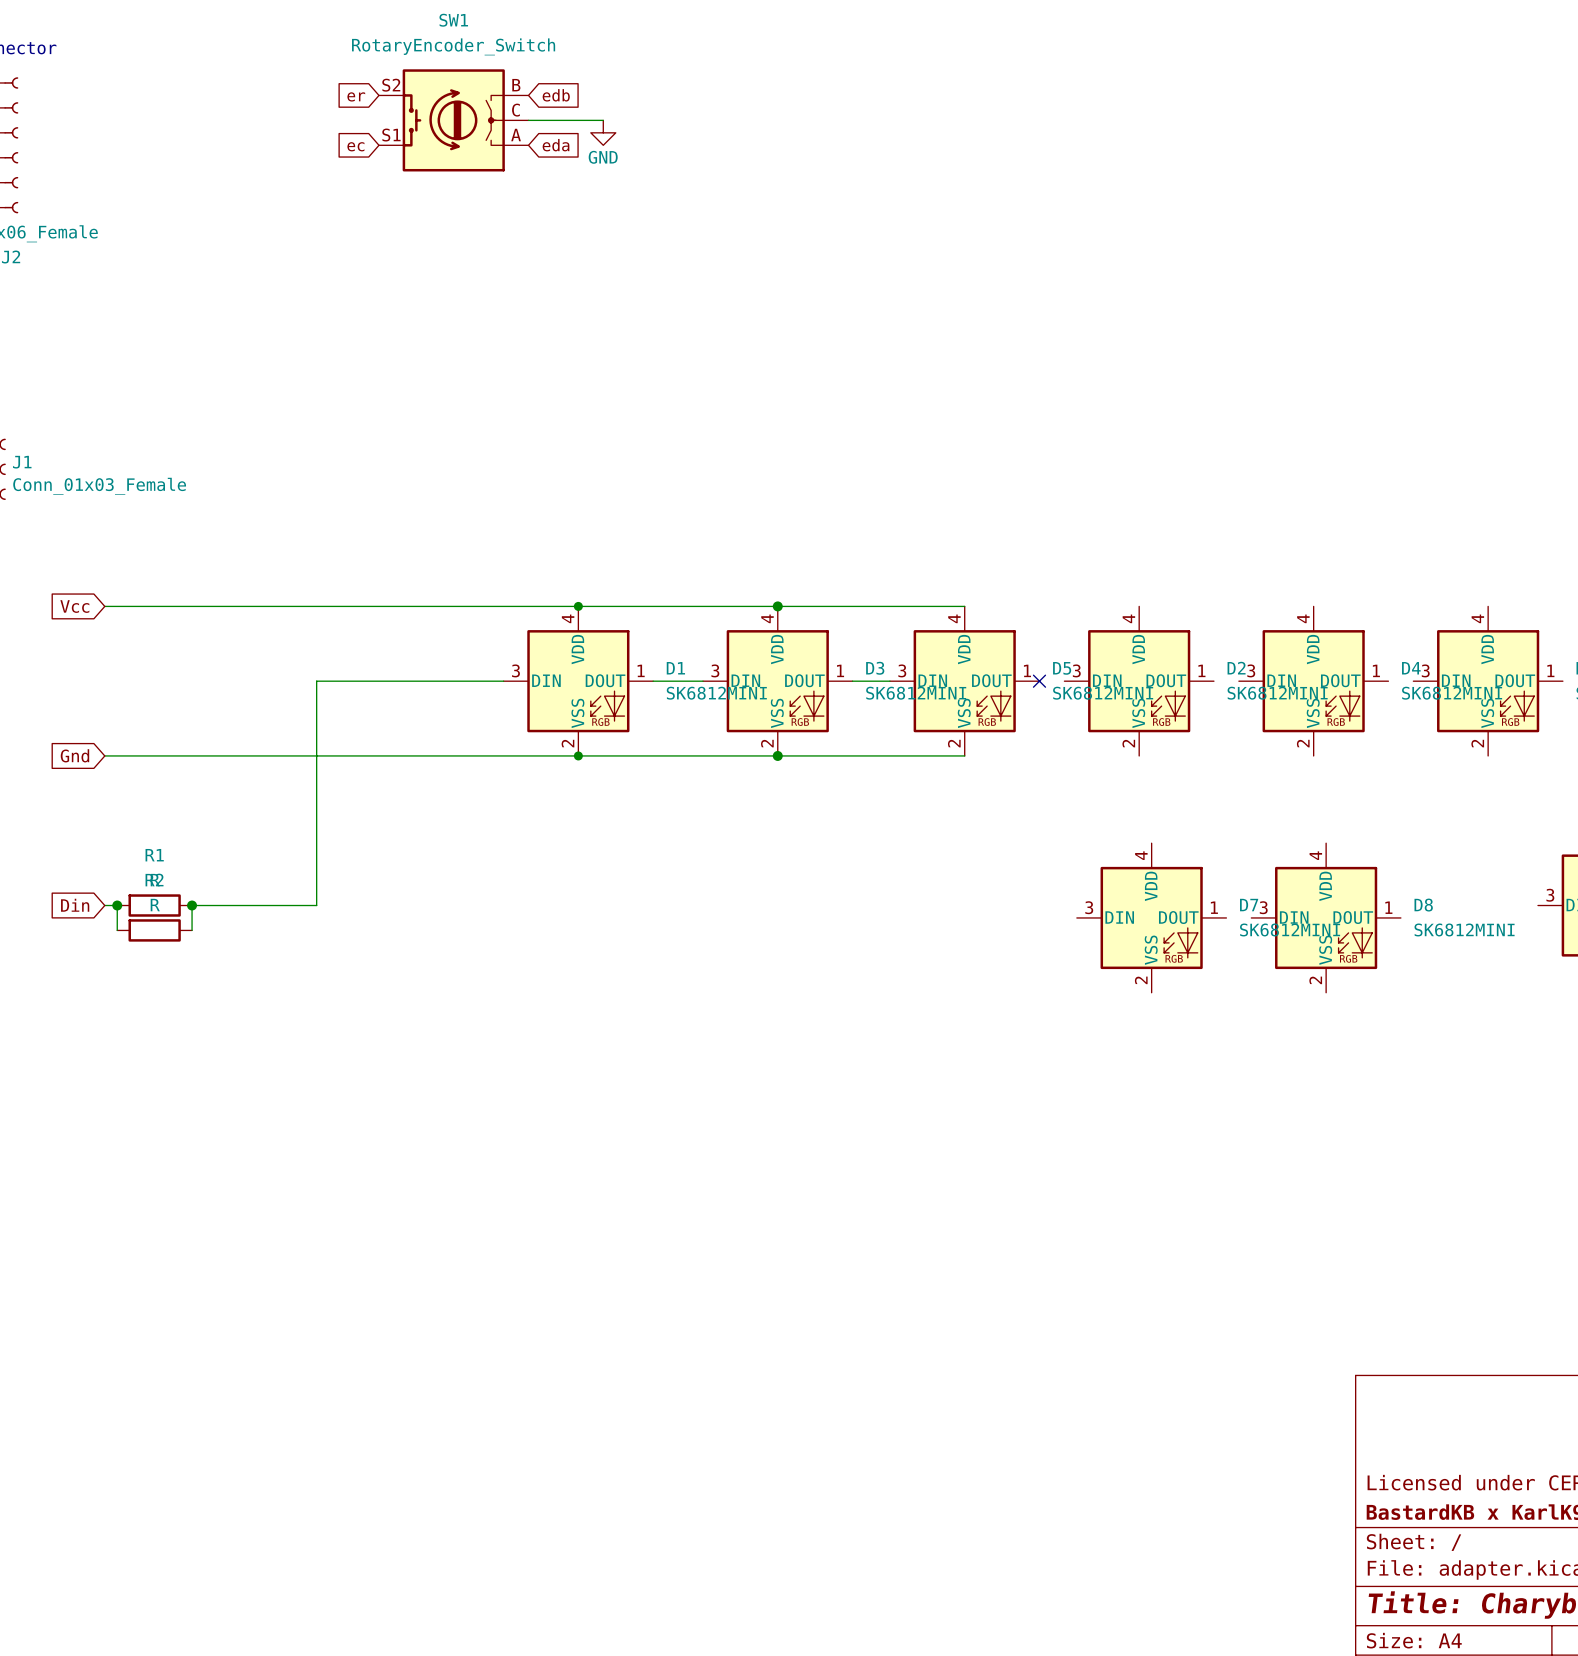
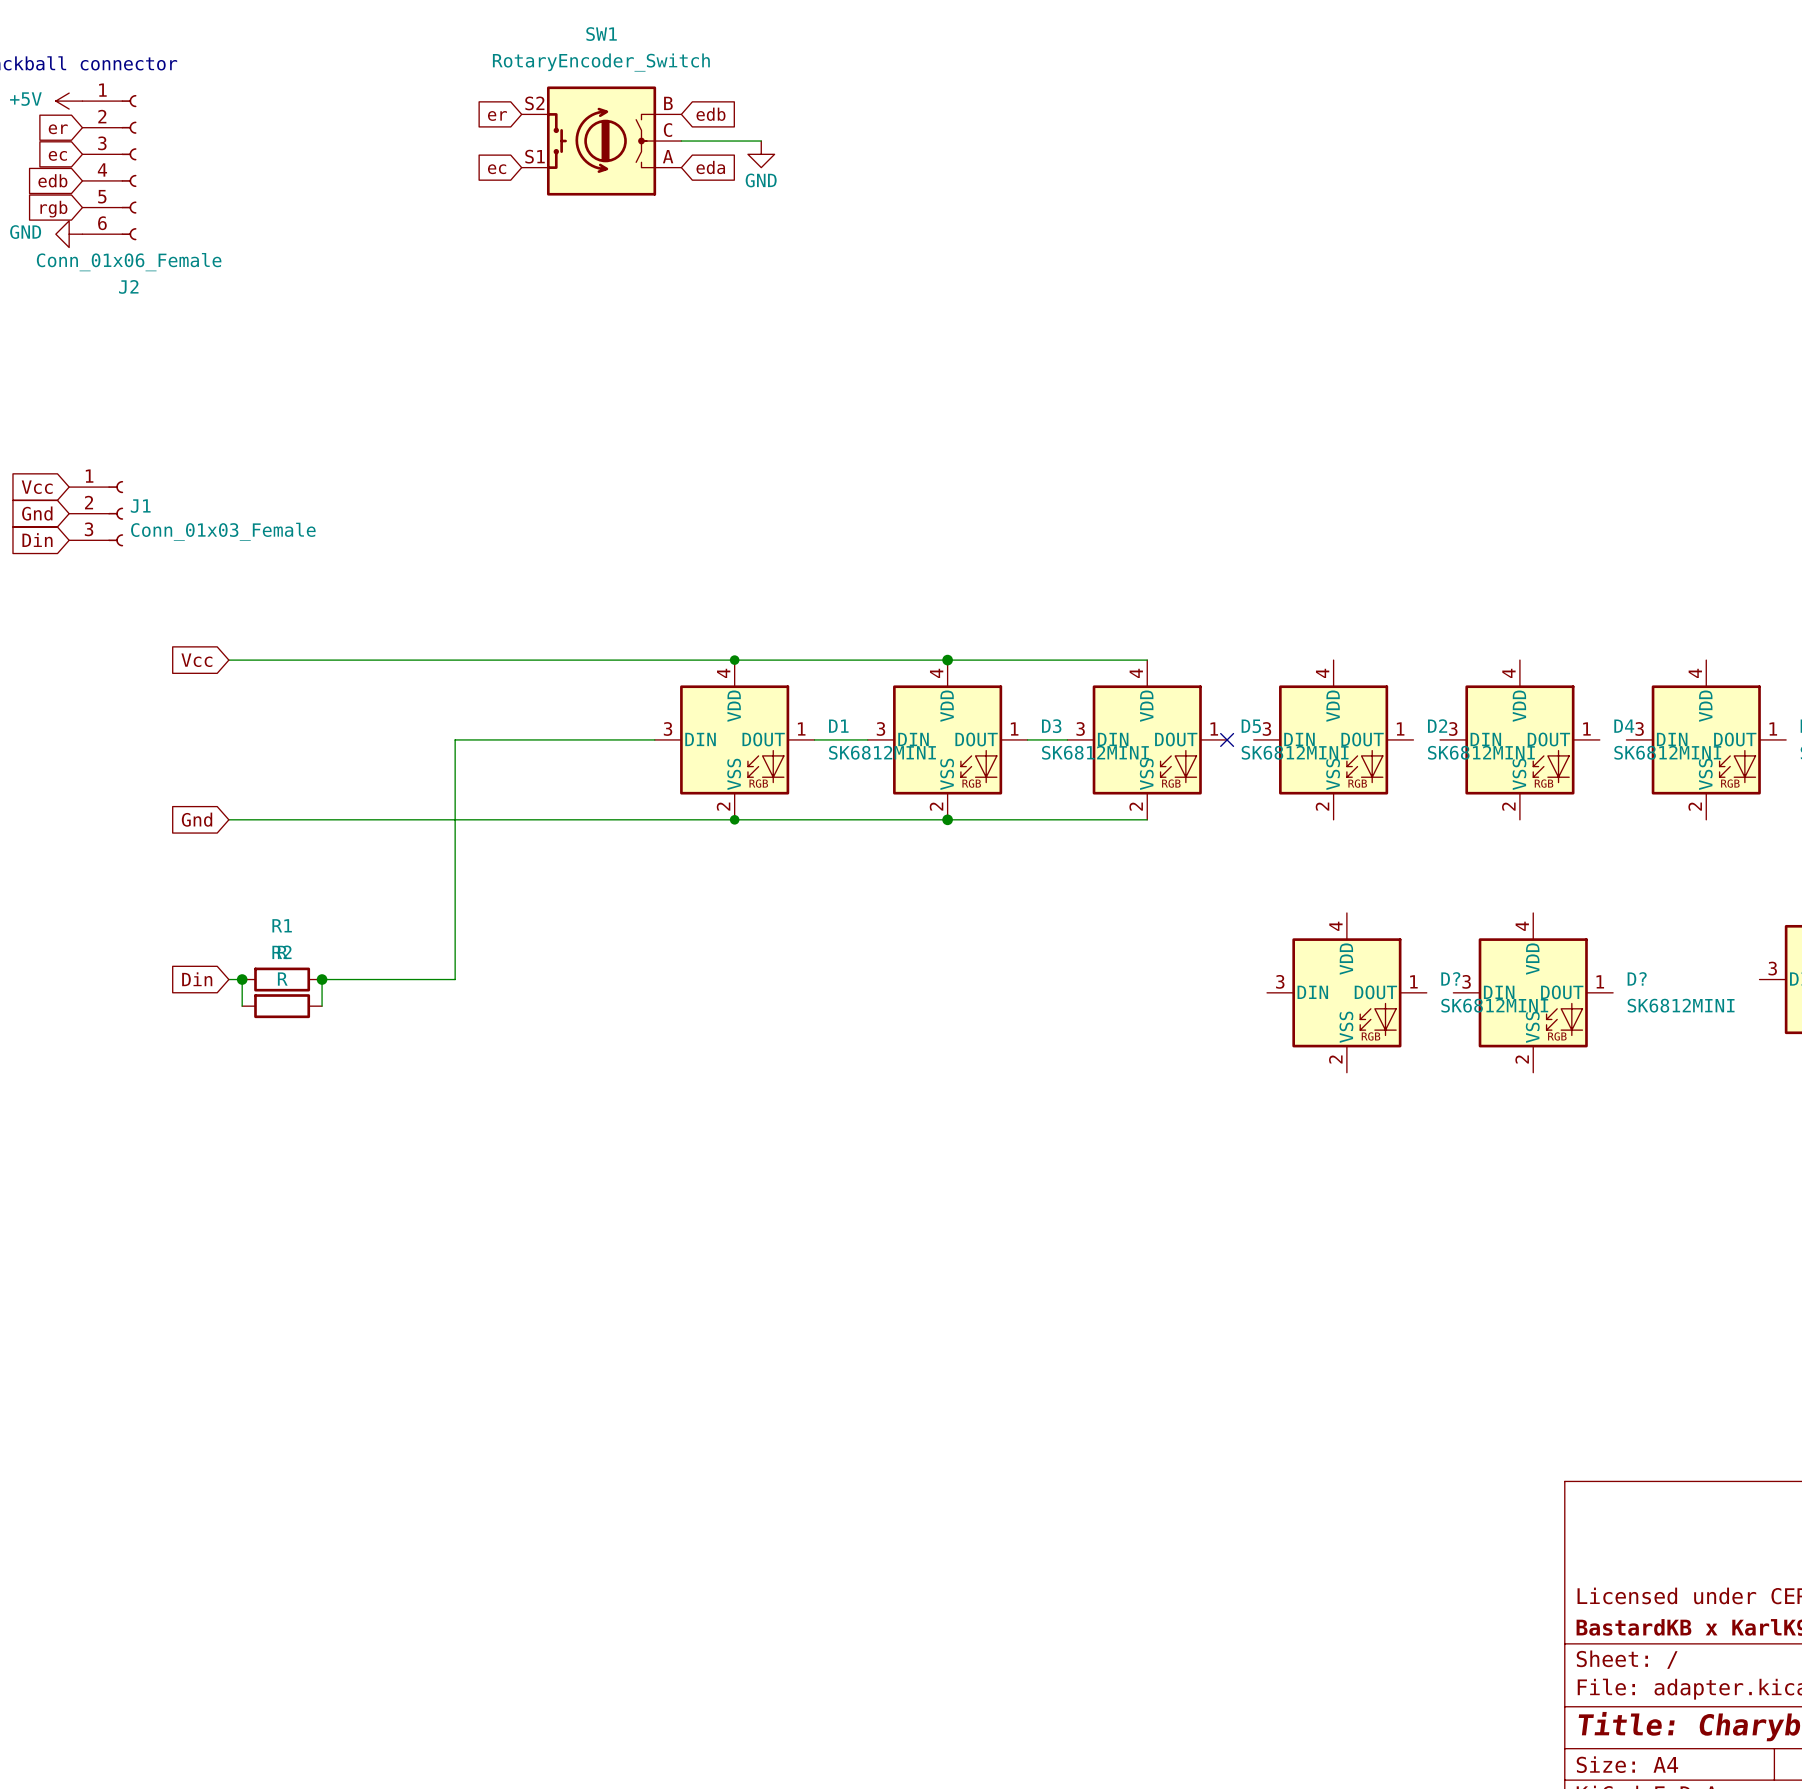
D7 name: D7 (1249, 905) -> D? (1450, 978)
D8 name: D8 (1423, 905) -> D? (1637, 978)

